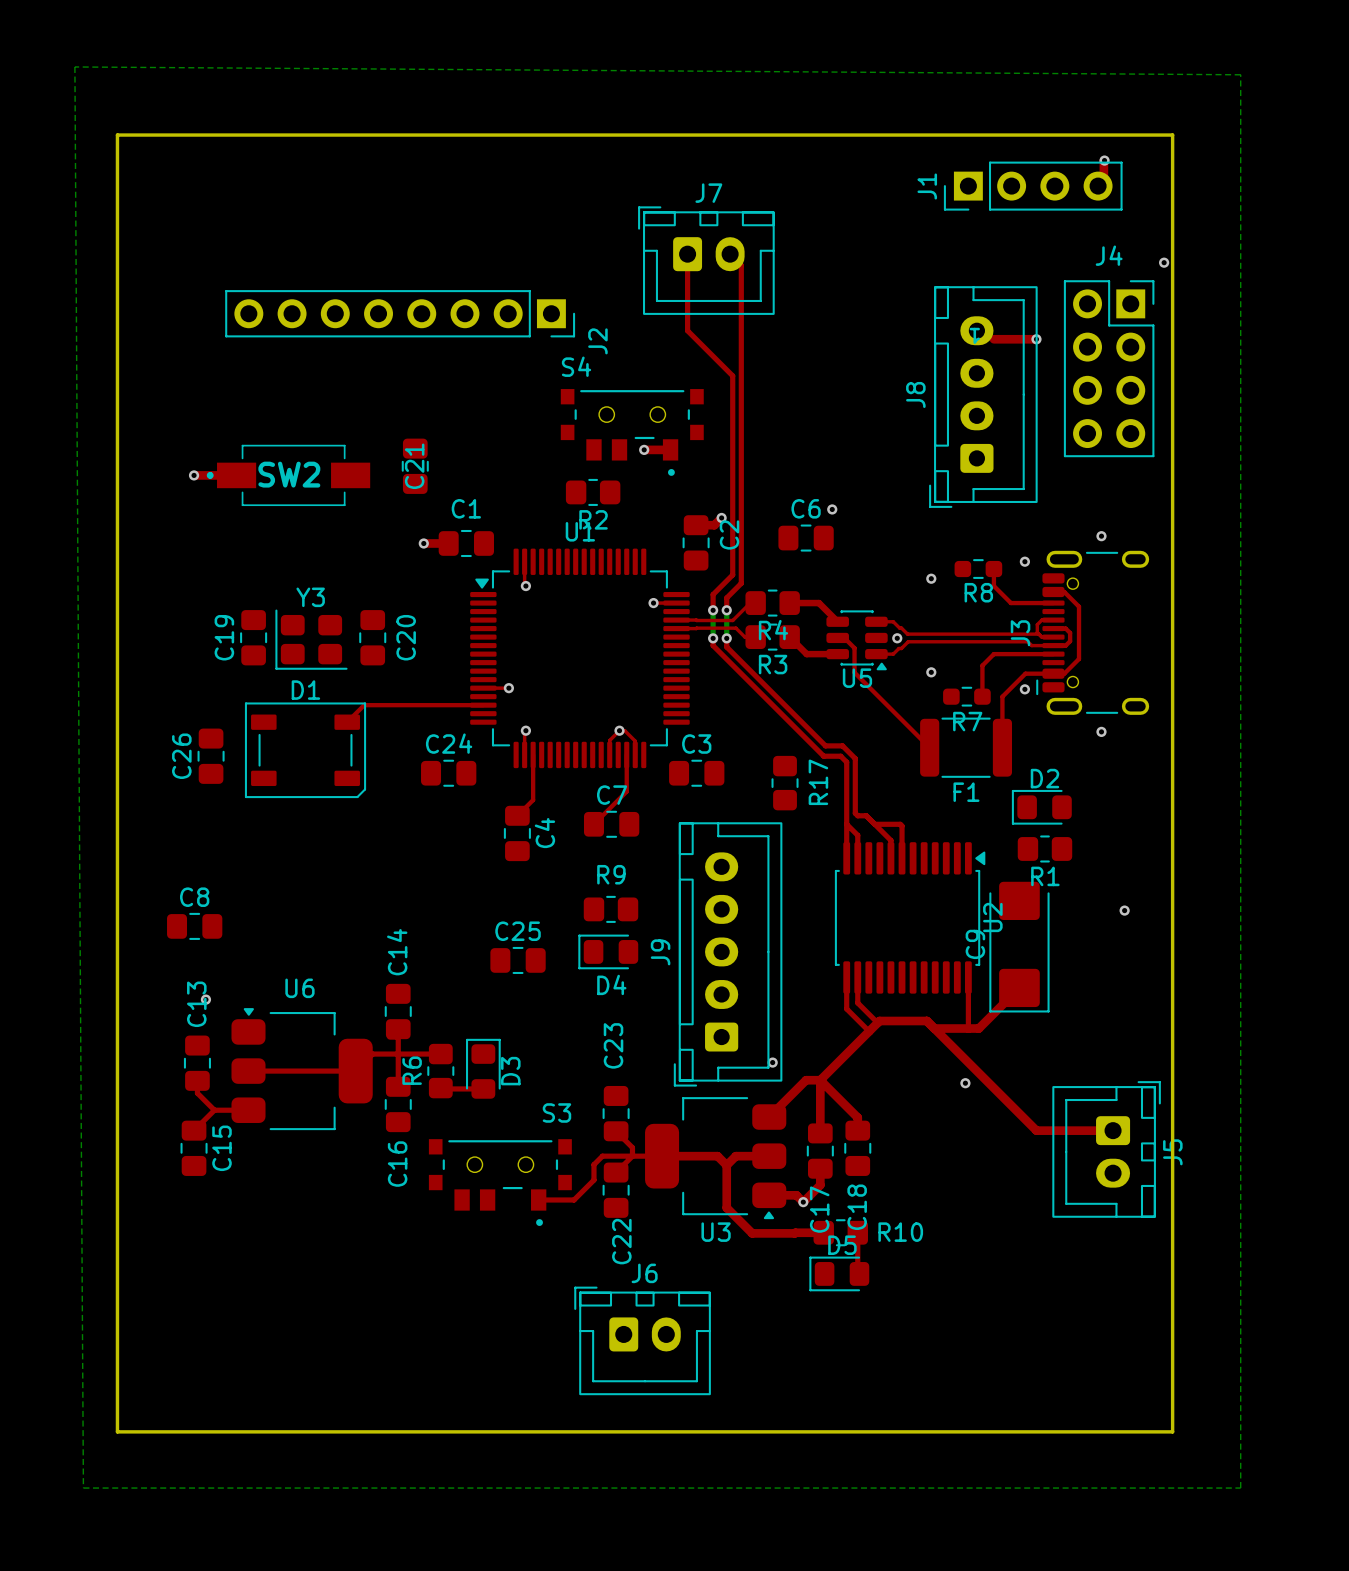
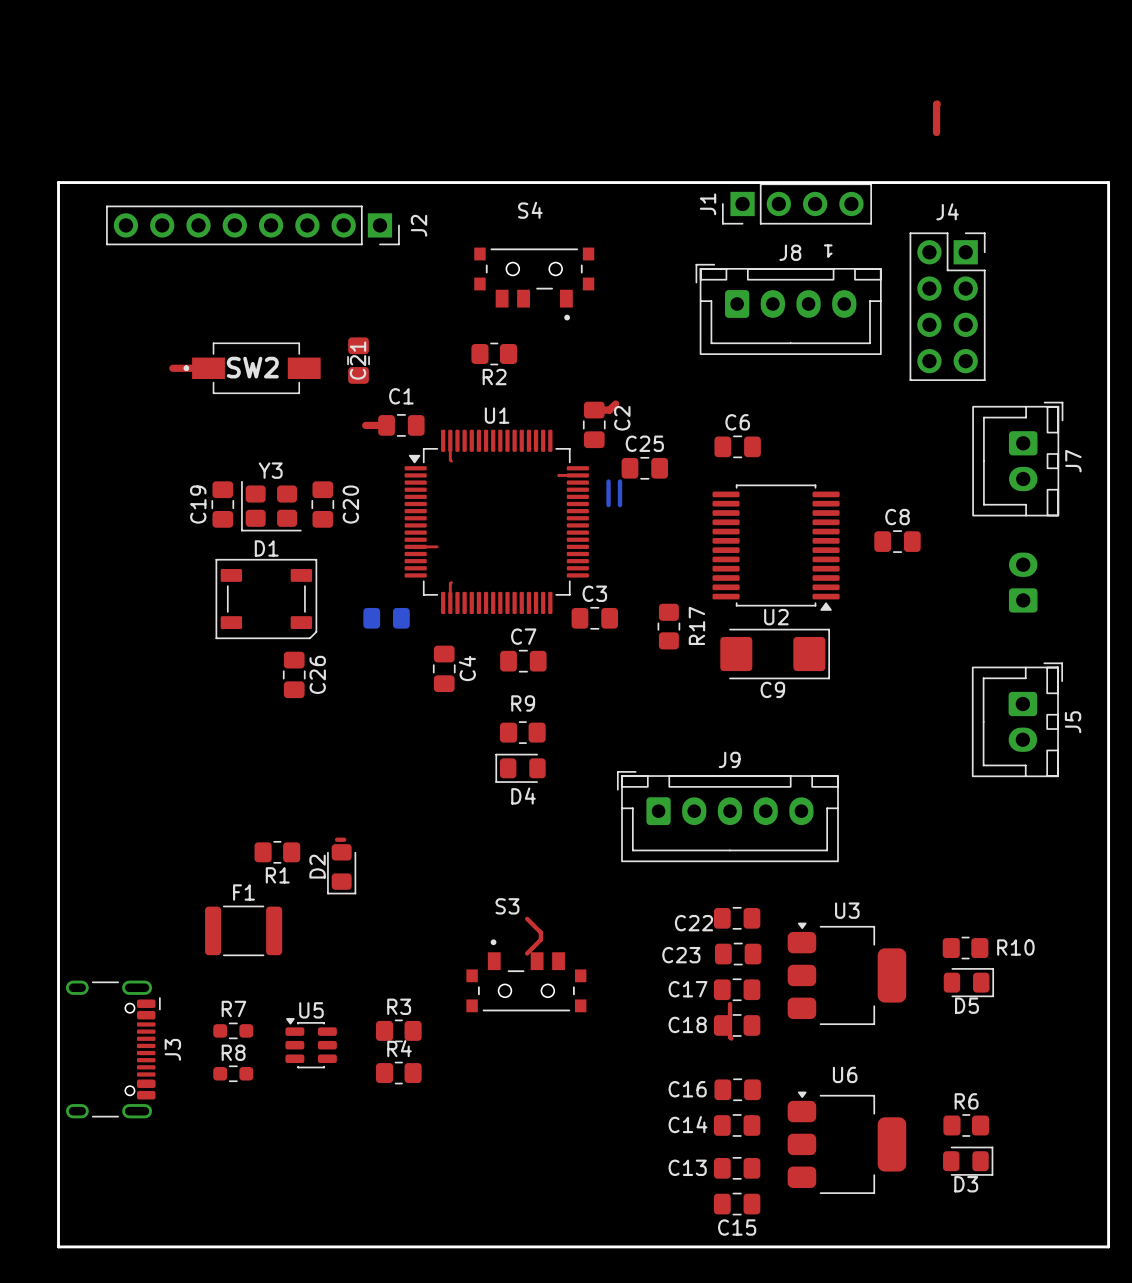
bottom zone outline: (74, 66) (83, 1488) (1240, 1488) (1240, 74) (74, 66) -> none
board edge: (117, 135) (1172, 135) (1172, 1431) (117, 1431) (117, 135) -> (58, 182) (58, 1246) (1108, 1246) (1108, 182) (58, 182)
via: (1104, 160) -> none
J1 position: (1033, 186) -> (796, 203)
top track: (687, 254) (687, 330) (732, 375) (732, 574) (713, 594) (713, 610) -> none
top track: (730, 254) (741, 265) (741, 583) (726, 597) (726, 610) -> none
J7 rotation: 0° (706, 260) -> 90° clockwise (1017, 459)
J7 position: (706, 260) -> (1017, 459)
via: (1164, 262) -> none
J2 position: (400, 313) -> (252, 225)
top track: (993, 339) (1036, 339) -> none
via: (1036, 339) -> none
J2 name position: J2 (597, 341) -> J2 (419, 225)
S4 name position: S4 (576, 366) -> S4 (530, 210)
J4 position: (1109, 368) -> (947, 306)
J8 rotation: 0° (983, 397) -> 90° clockwise (788, 309)
S4 position: (632, 432) -> (534, 283)
top track: (644, 449) (670, 449) -> none
via: (644, 449) -> none
via: (194, 475) -> none
R2 position: (593, 492) -> (494, 353)
via: (832, 509) -> none
via: (721, 517) -> none
via: (1101, 536) -> none
C6 position: (806, 538) -> (737, 446)
via: (423, 543) -> none
via: (1024, 561) -> none
R8 position: (978, 569) -> (233, 1073)
top track: (993, 569) (993, 586) (1010, 603) (1053, 603) -> none
via: (931, 578) -> none
via: (525, 586) -> none
top track: (1053, 591) (1064, 591) (1079, 606) (1079, 659) (1064, 673) (1025, 673) (1002, 696) (1002, 747) -> none
R8 name position: R8 (978, 592) -> R8 (233, 1052)
via: (653, 603) -> none
top track: (755, 603) (750, 603) (732, 620) (676, 620) -> none
R4 position: (772, 603) -> (398, 1073)
top track: (789, 603) (818, 603) (837, 621) -> none
via: (713, 610) -> none
via: (726, 610) -> none
top track: (1053, 620) (1041, 620) (1037, 624) (1037, 632) (1041, 637) (1053, 637) -> none
top track: (876, 621) (893, 621) (907, 634) (1038, 634) -> none
top track: (676, 628) (735, 628) (744, 637) (755, 637) -> none
top track: (1053, 628) (1065, 628) (1070, 632) (1070, 641) (1065, 645) (1031, 645) (1027, 641) (908, 641) (893, 654) (876, 654) -> none
R4 name position: R4 (773, 630) -> R4 (399, 1048)
J3 rotation: 0° (1092, 632) -> 180° (113, 1049)
J3 position: (1092, 632) -> (113, 1049)
R3 position: (772, 637) -> (398, 1030)
top track: (789, 637) (806, 654) (837, 654) -> none
top track: (837, 637) (844, 637) (854, 648) (854, 672) (929, 747) -> none
top track: (713, 638) (713, 645) (823, 756) (840, 756) (846, 762) (846, 858) -> none
via: (713, 638) -> none
top track: (726, 638) (726, 647) (825, 745) (842, 745) (855, 758) (855, 813) (857, 815) (866, 815) (890, 840) (890, 858) -> none
via: (726, 638) -> none
via: (897, 638) -> none
U5 rotation: 0° (857, 640) -> 180° (311, 1043)
U5 position: (857, 640) -> (311, 1043)
top track: (1053, 654) (993, 654) (982, 665) (982, 696) -> none
R3 name position: R3 (773, 664) -> R3 (399, 1006)
via: (931, 672) -> none
via: (508, 688) -> none
via: (1024, 689) -> none
R7 position: (966, 696) -> (233, 1030)
top track: (483, 705) (364, 705) (347, 722) -> none
R7 name position: R7 (967, 721) -> R7 (233, 1008)
via: (525, 730) -> none
via: (619, 730) -> none
part: none -> (1023, 582)
via: (1101, 731) -> none
F1 position: (966, 747) -> (243, 930)
top track: (533, 754) (533, 800) (517, 815) -> none
top track: (609, 754) (609, 740) (619, 730) (624, 730) (635, 741) (635, 754) -> none
top track: (626, 754) (626, 791) (593, 824) -> none
C26 name position: C26 (181, 756) -> C26 (317, 674)
C26 position: (211, 756) -> (294, 674)
C24 side: top (448, 773) -> bottom (386, 618)
F1 name position: F1 (966, 792) -> F1 (243, 892)
D2 rotation: 0° (1041, 807) -> 90° counterclockwise (341, 869)
D2 position: (1041, 807) -> (341, 869)
top track: (846, 824) (857, 835) (857, 858) -> none
top track: (874, 824) (900, 824) (902, 826) (902, 858) -> none
R1 position: (1044, 848) -> (277, 852)
via: (1124, 910) -> none
U2 rotation: 0° (910, 917) -> 90° clockwise (776, 547)
U2 position: (910, 917) -> (776, 547)
C8 position: (194, 926) -> (897, 541)
C9 rotation: 0° (1019, 947) -> 90° counterclockwise (775, 654)
C9 position: (1019, 947) -> (775, 654)
C14 name position: C14 (397, 952) -> C14 (688, 1124)
J9 rotation: 0° (728, 954) -> 90° clockwise (727, 816)
C25 position: (518, 960) -> (644, 468)
top track: (846, 977) (846, 1008) (869, 1031) -> none
top track: (857, 977) (857, 1003) (877, 1022) -> none
top track: (968, 977) (968, 1028) -> none
top track: (1019, 987) (978, 1028) (934, 1028) -> none
via: (205, 999) -> none
C13 name position: C13 (196, 1004) -> C13 (687, 1167)
C14 rotation: 0° (398, 1011) -> 90° clockwise (737, 1125)
C14 position: (398, 1011) -> (737, 1125)
top track: (398, 1029) (398, 1086) -> none
C23 name position: C23 (613, 1045) -> C23 (681, 955)
top track: (440, 1054) (372, 1054) (355, 1071) (248, 1071) -> none
via: (772, 1062) -> none
C13 rotation: 0° (197, 1063) -> 90° clockwise (737, 1168)
C13 position: (197, 1063) -> (737, 1168)
D3 rotation: 0° (483, 1068) -> 90° clockwise (968, 1161)
D3 position: (483, 1068) -> (968, 1161)
U6 position: (302, 1069) -> (846, 1142)
R6 rotation: 0° (440, 1071) -> 90° clockwise (966, 1125)
R6 position: (440, 1071) -> (966, 1125)
top track: (197, 1080) (197, 1093) (214, 1110) -> none
top track: (820, 1080) (820, 1133) -> none
top track: (820, 1080) (857, 1117) (857, 1130) -> none
top track: (820, 1080) (879, 1021) (926, 1021) (1036, 1130) (1113, 1130) -> none
top track: (820, 1080) (806, 1080) (769, 1117) -> none
via: (965, 1083) -> none
top track: (440, 1088) (483, 1088) -> none
C16 rotation: 0° (398, 1104) -> 90° clockwise (737, 1089)
C16 position: (398, 1104) -> (737, 1089)
top track: (214, 1110) (248, 1110) -> none
top track: (214, 1110) (194, 1130) -> none
S3 name position: S3 (556, 1112) -> S3 (507, 906)
C23 rotation: 0° (616, 1113) -> 90° clockwise (738, 954)
C23 position: (616, 1113) -> (738, 954)
C15 rotation: 0° (194, 1148) -> 90° clockwise (737, 1204)
C15 position: (194, 1148) -> (737, 1204)
C18 rotation: 0° (857, 1148) -> 90° clockwise (737, 1025)
C18 position: (857, 1148) -> (737, 1025)
J5 position: (1106, 1149) -> (1017, 719)
C17 rotation: 0° (820, 1151) -> 90° clockwise (737, 989)
C17 position: (820, 1151) -> (737, 989)
top track: (769, 1156) (735, 1156) (726, 1165) -> none
U3 rotation: 0° (715, 1158) -> 180° (846, 973)
U3 position: (715, 1158) -> (846, 973)
top track: (726, 1165) (717, 1156) (602, 1156) (593, 1164) (593, 1180) (574, 1199) (538, 1199) -> none
top track: (726, 1165) (726, 1207) (752, 1233) (823, 1232) -> none
top track: (820, 1168) (820, 1185) (803, 1202) (796, 1195) (769, 1195) -> none
S3 rotation: 0° (500, 1182) -> 180° (526, 975)
S3 position: (500, 1182) -> (526, 975)
C22 rotation: 0° (616, 1190) -> 90° clockwise (737, 918)
C22 position: (616, 1190) -> (737, 918)
via: (803, 1202) -> none
R10 position: (840, 1232) -> (965, 948)
D5 rotation: 0° (839, 1273) -> 180° (968, 982)
D5 position: (839, 1273) -> (968, 982)
J6: (642, 1340) -> none

